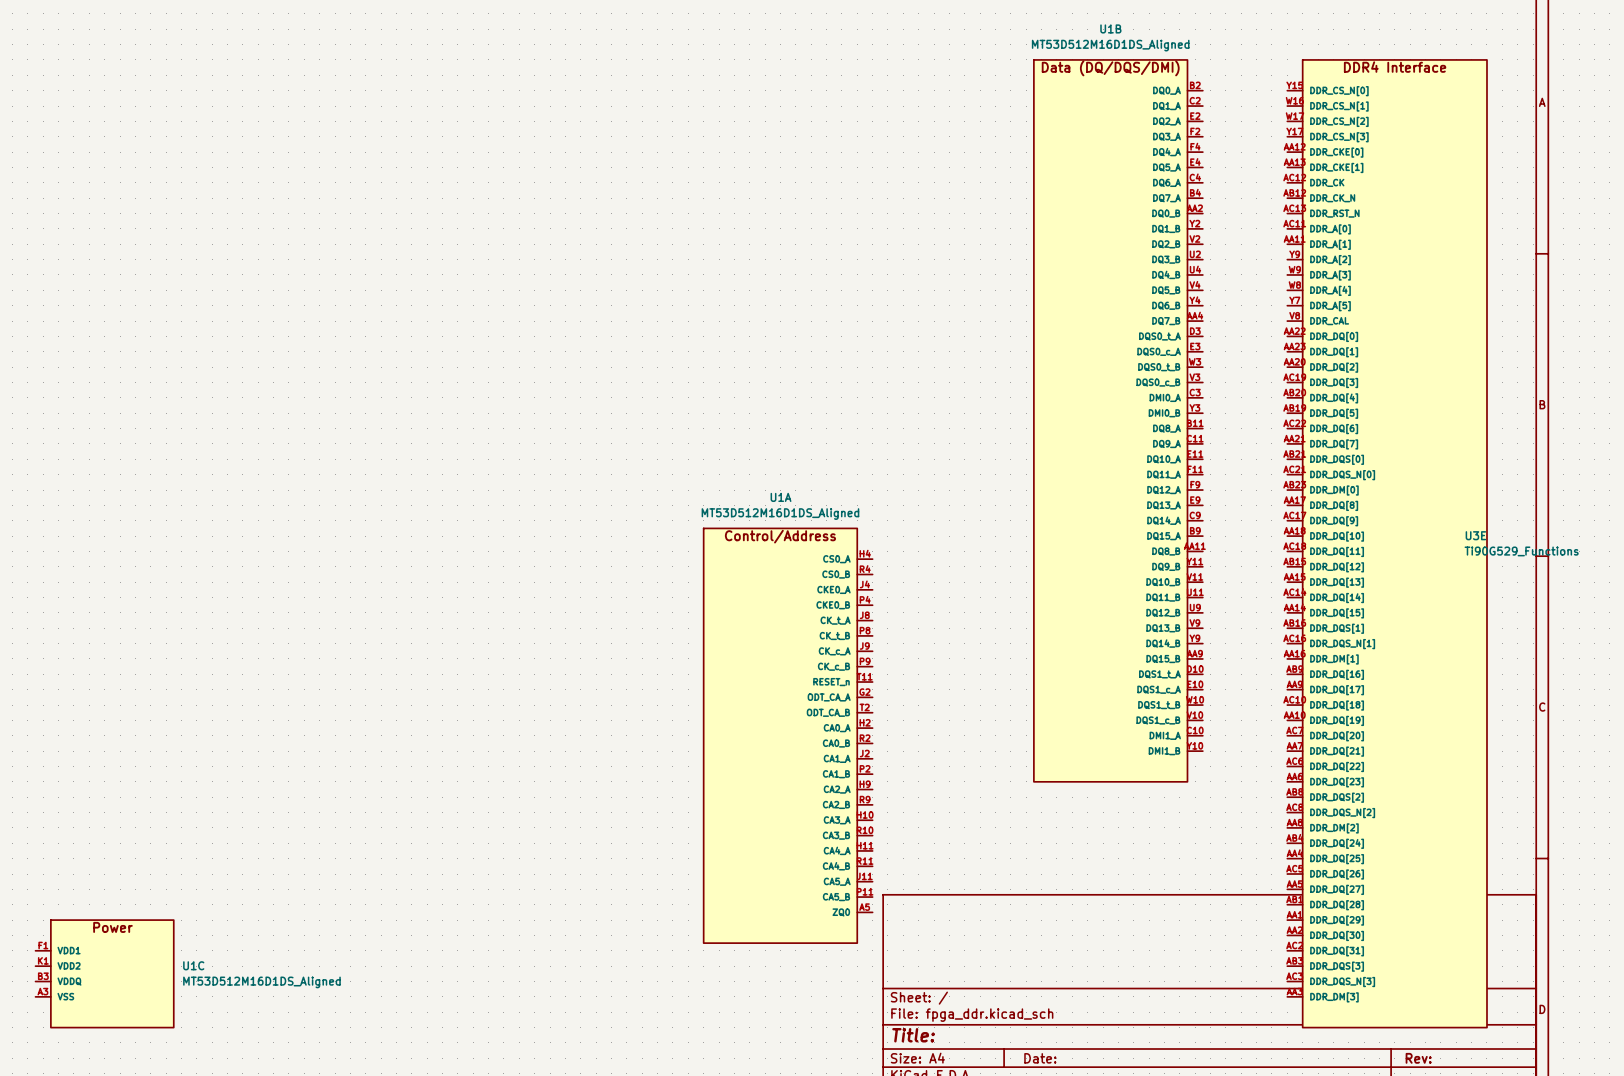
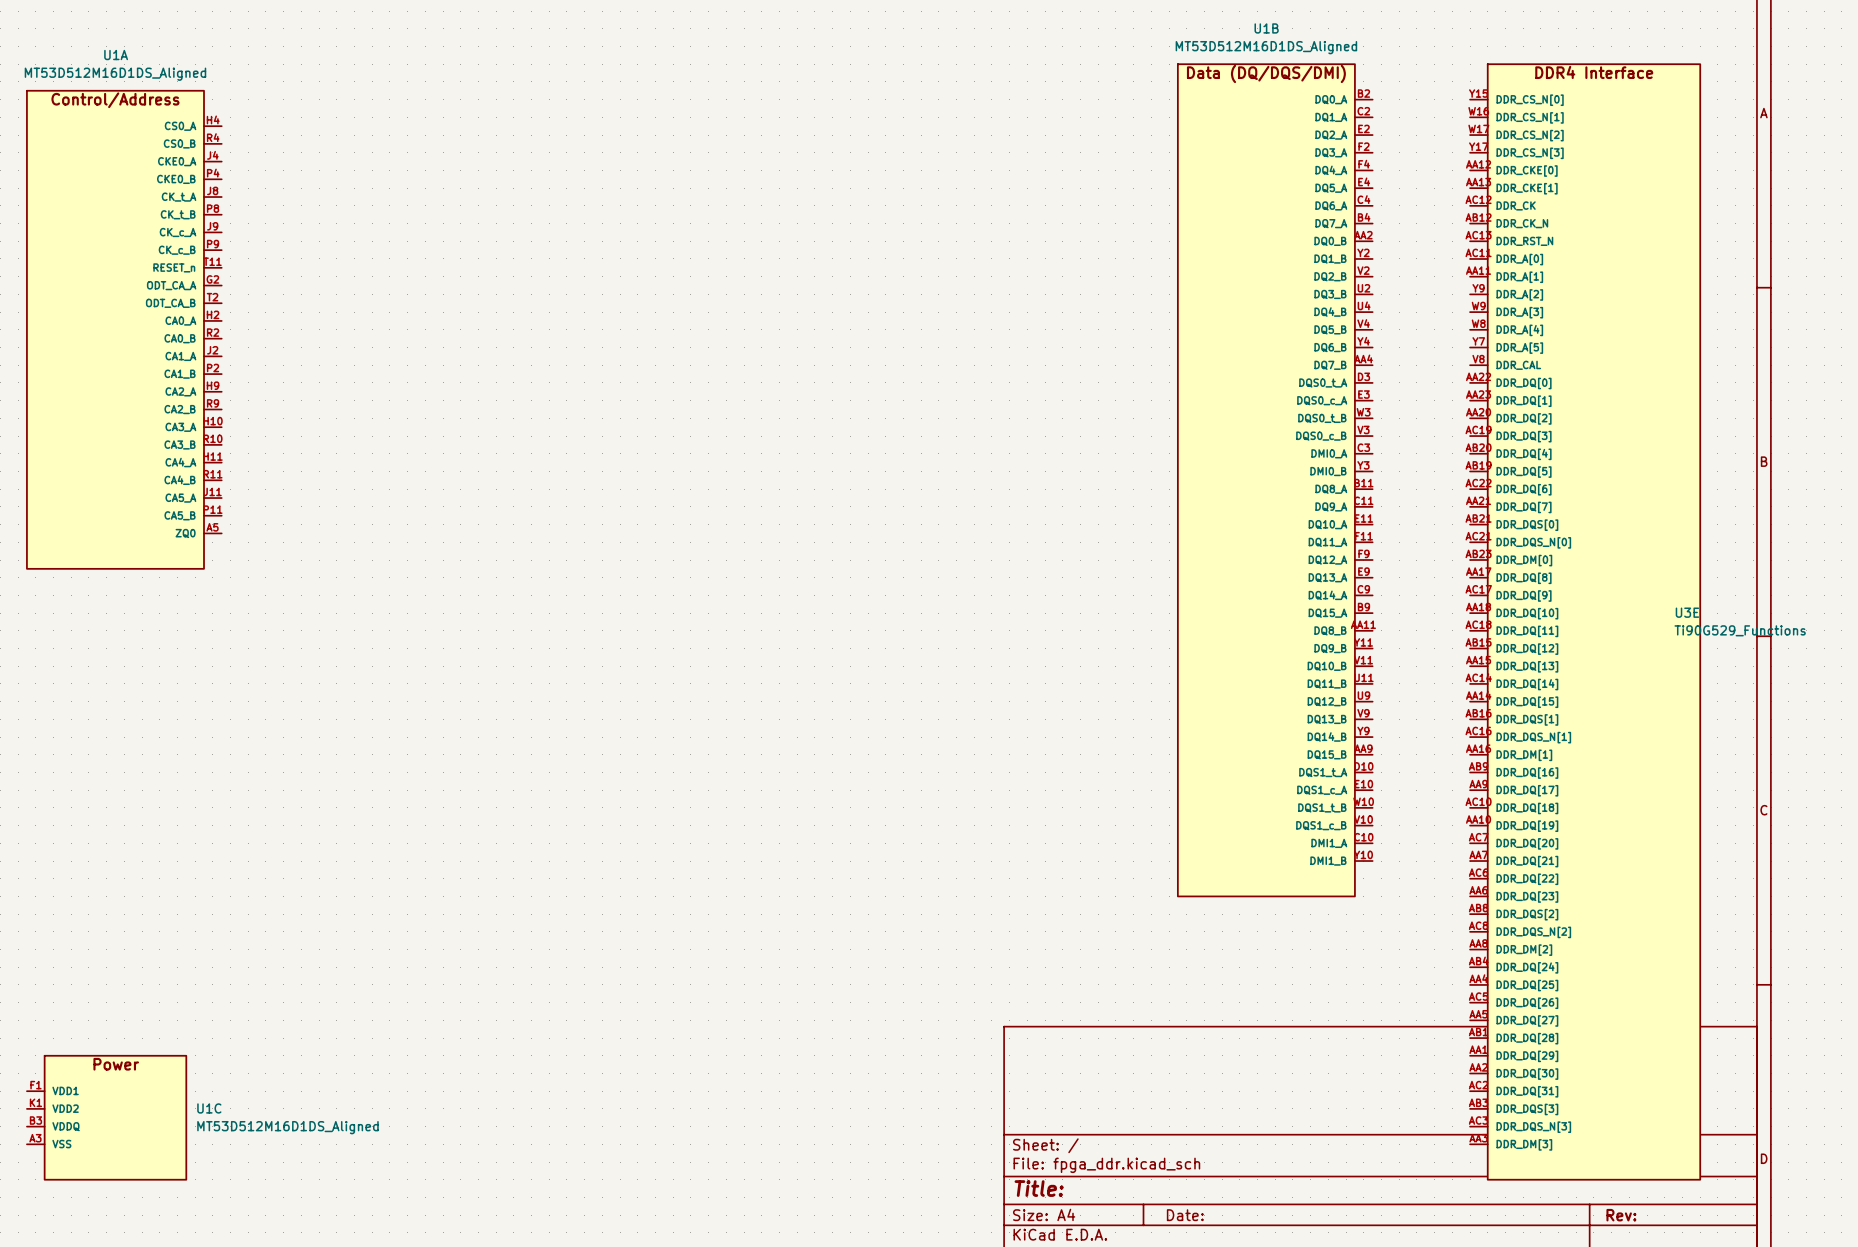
U1A position: (787, 735) -> (123, 329)

